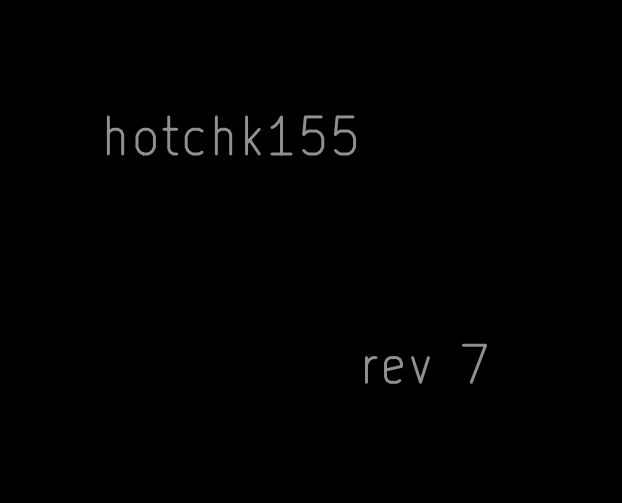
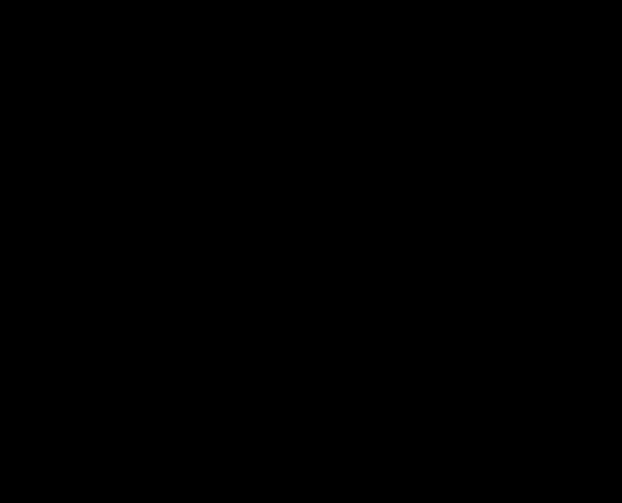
text: hotchk155 (231, 135) -> none
text: rev 7 (426, 363) -> none

